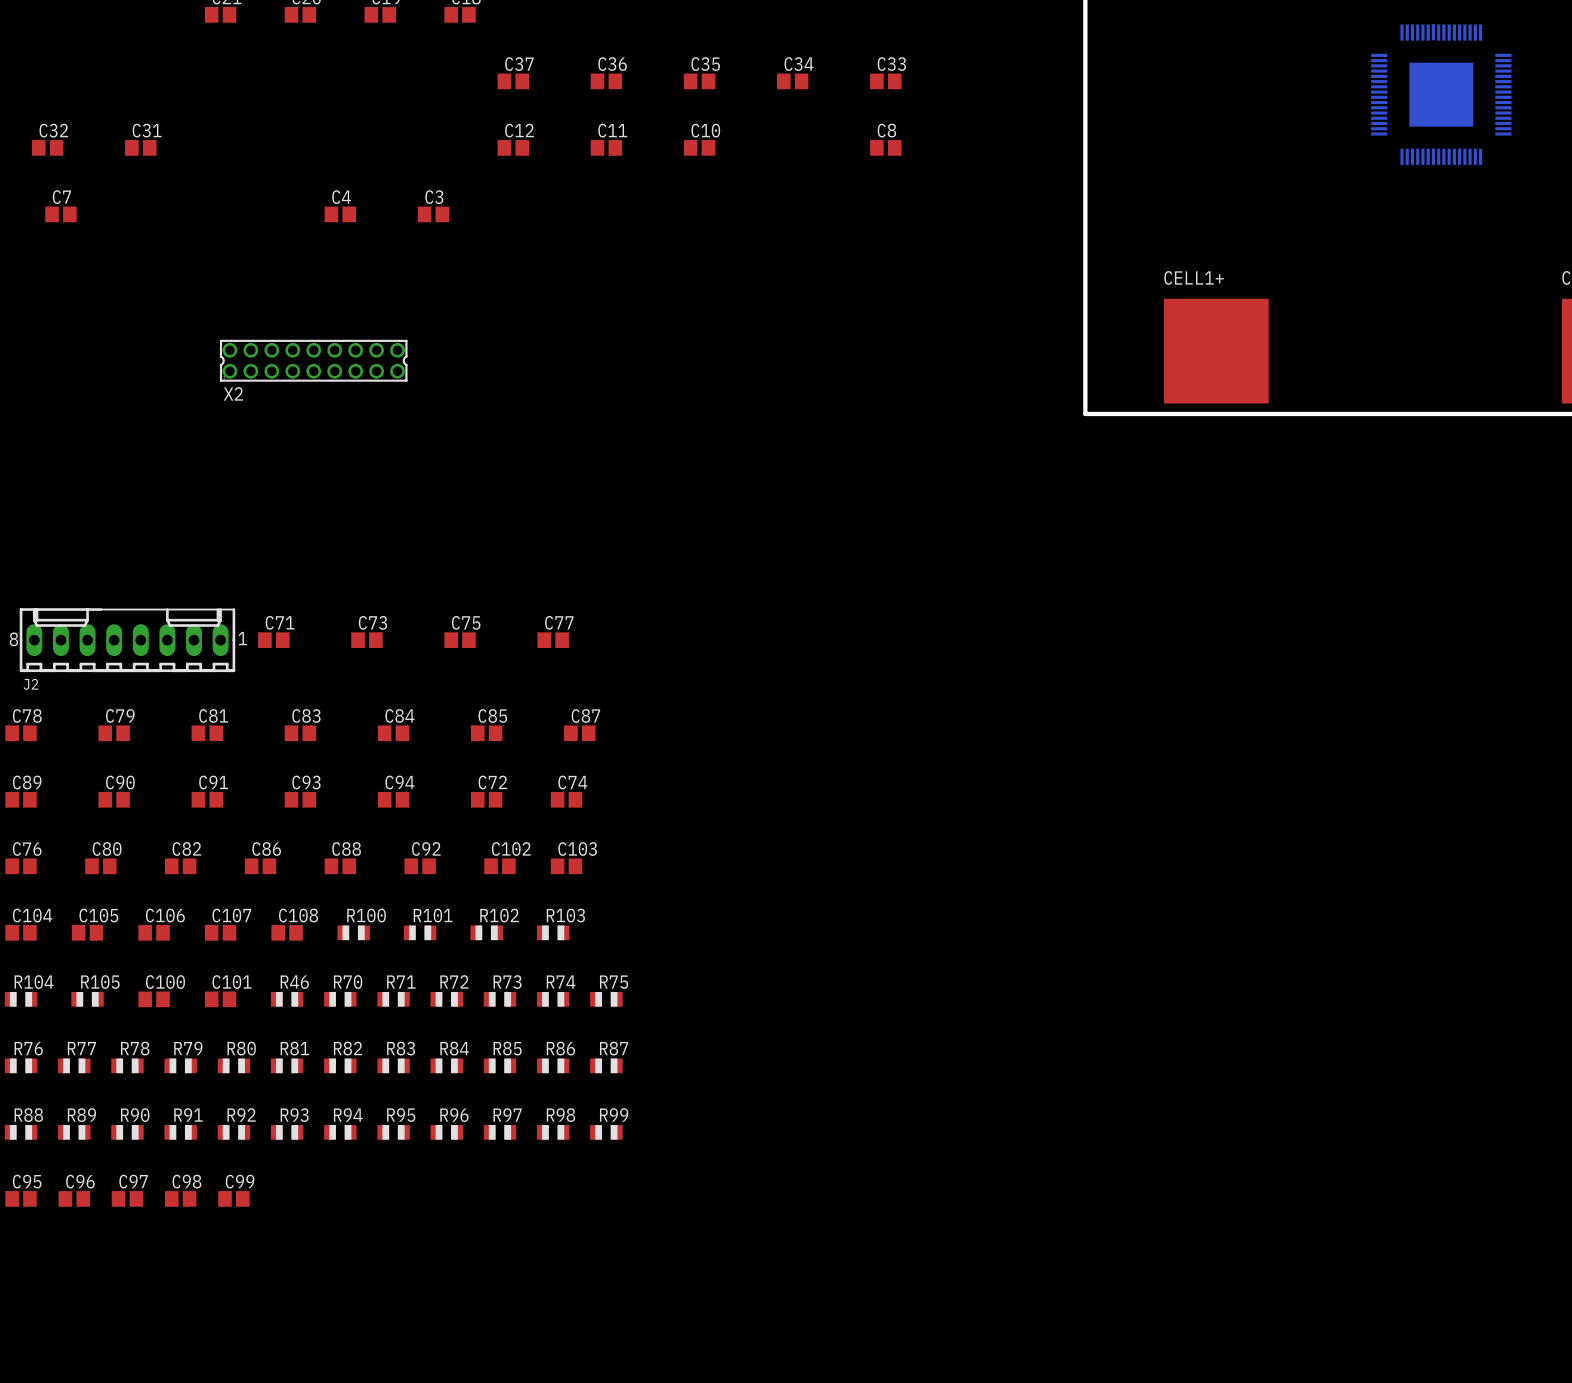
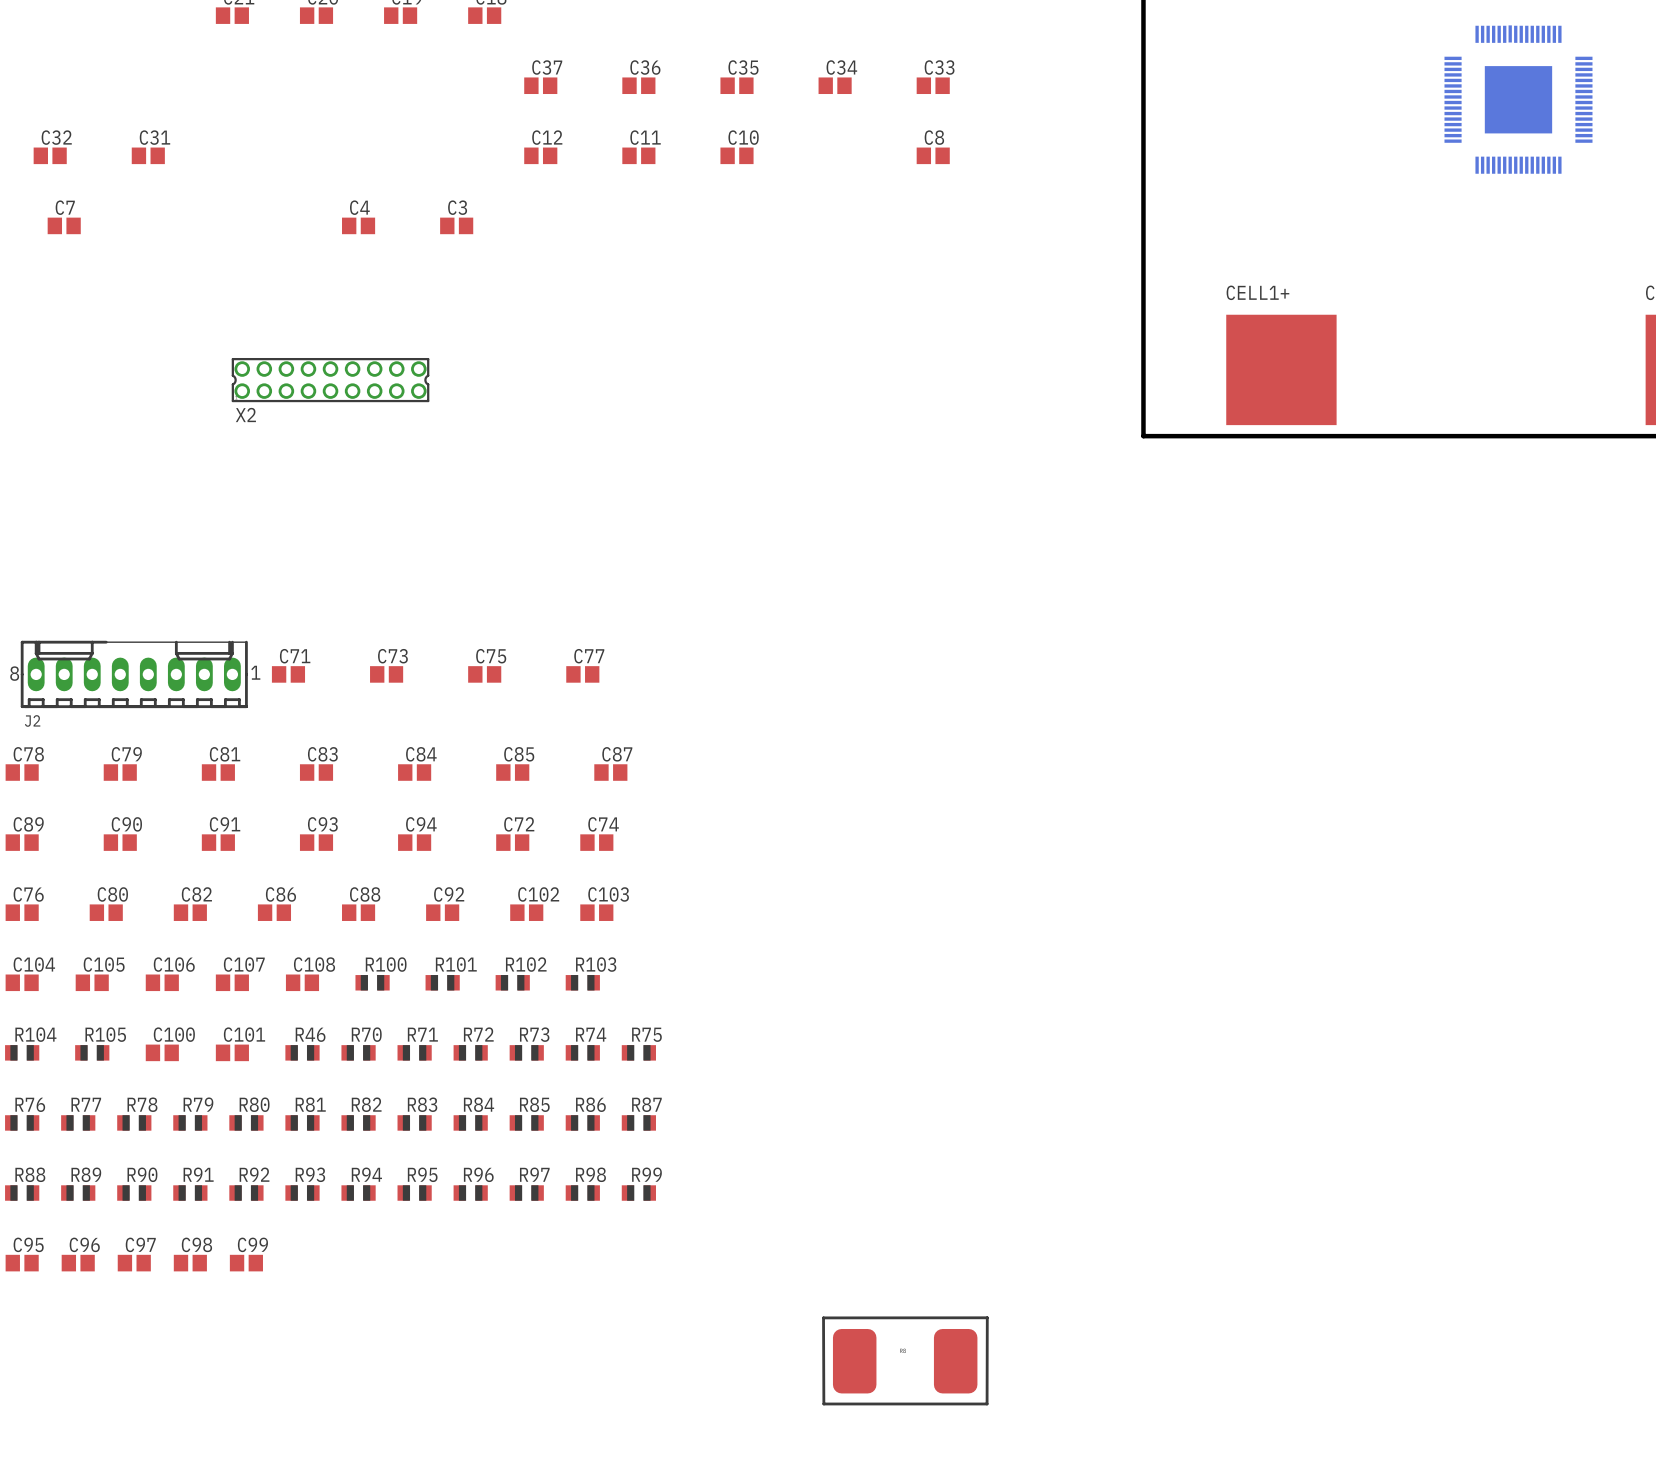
part: none -> (905, 1360)

